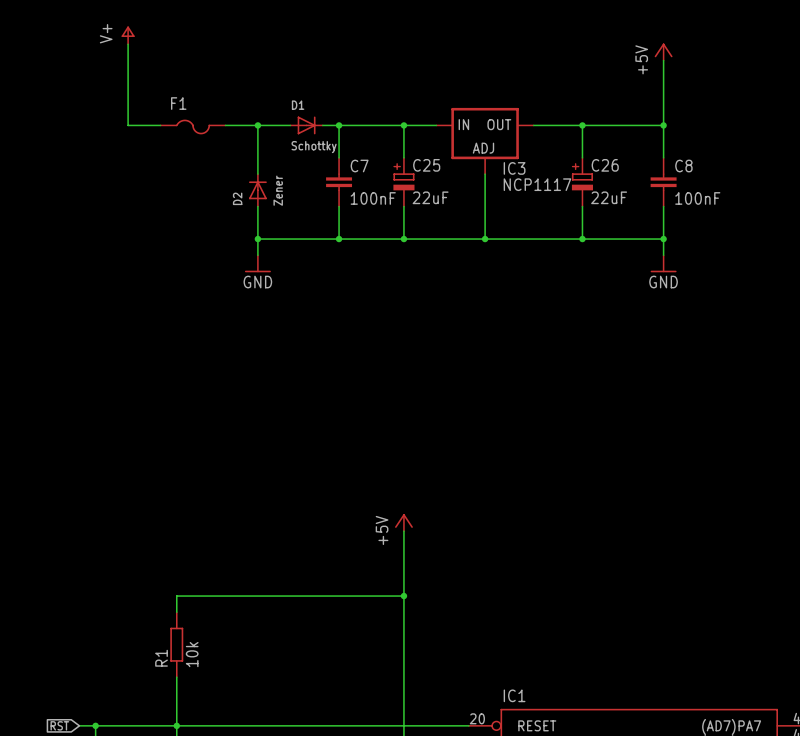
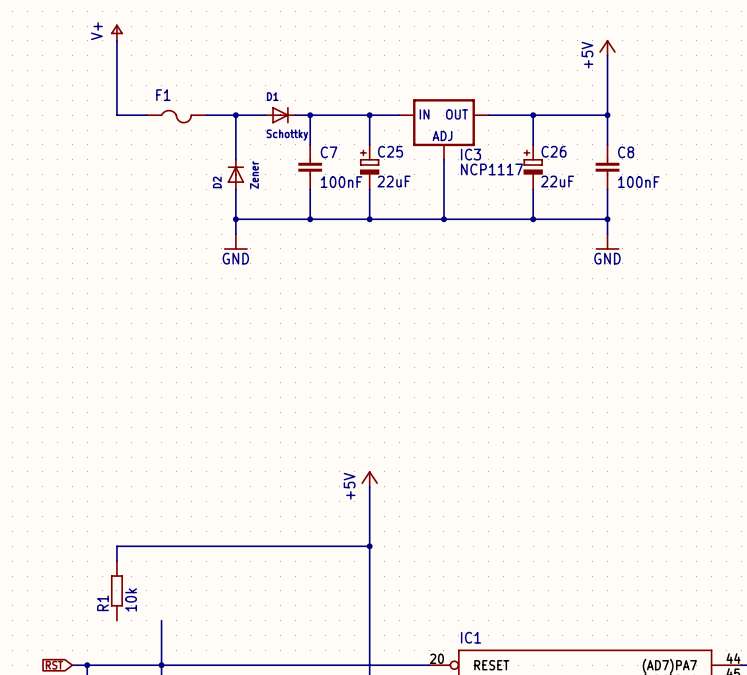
wire: (176, 596) (176, 612) -> (161, 546) (116, 546) (116, 561)
R1 position: (176, 644) -> (116, 590)

